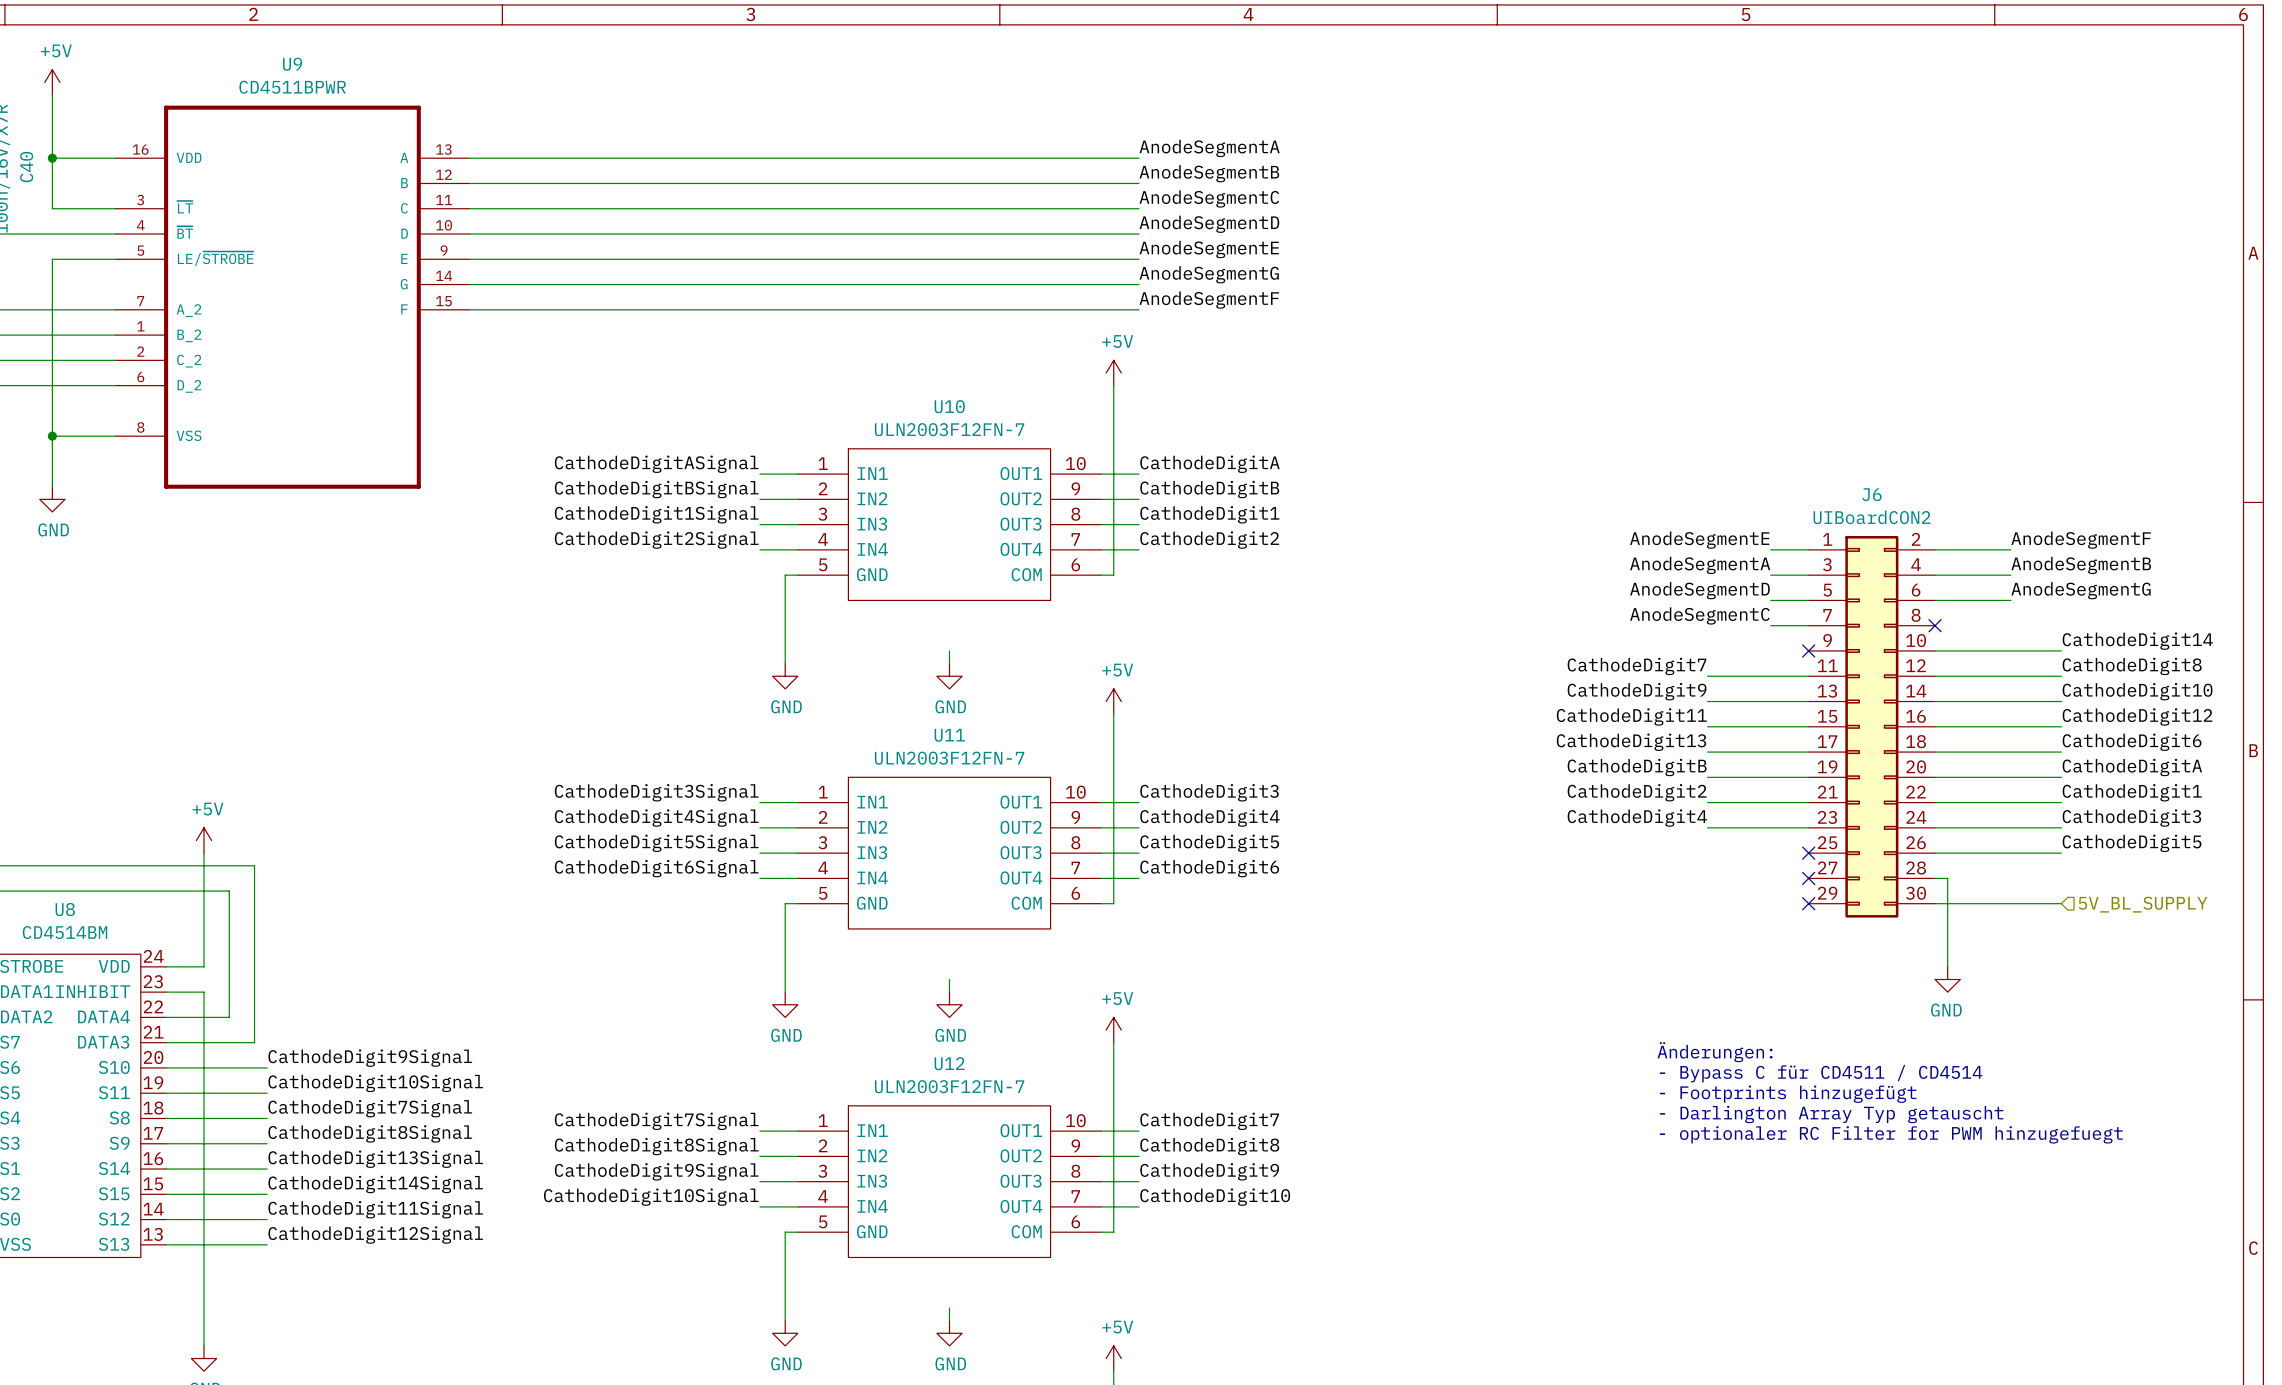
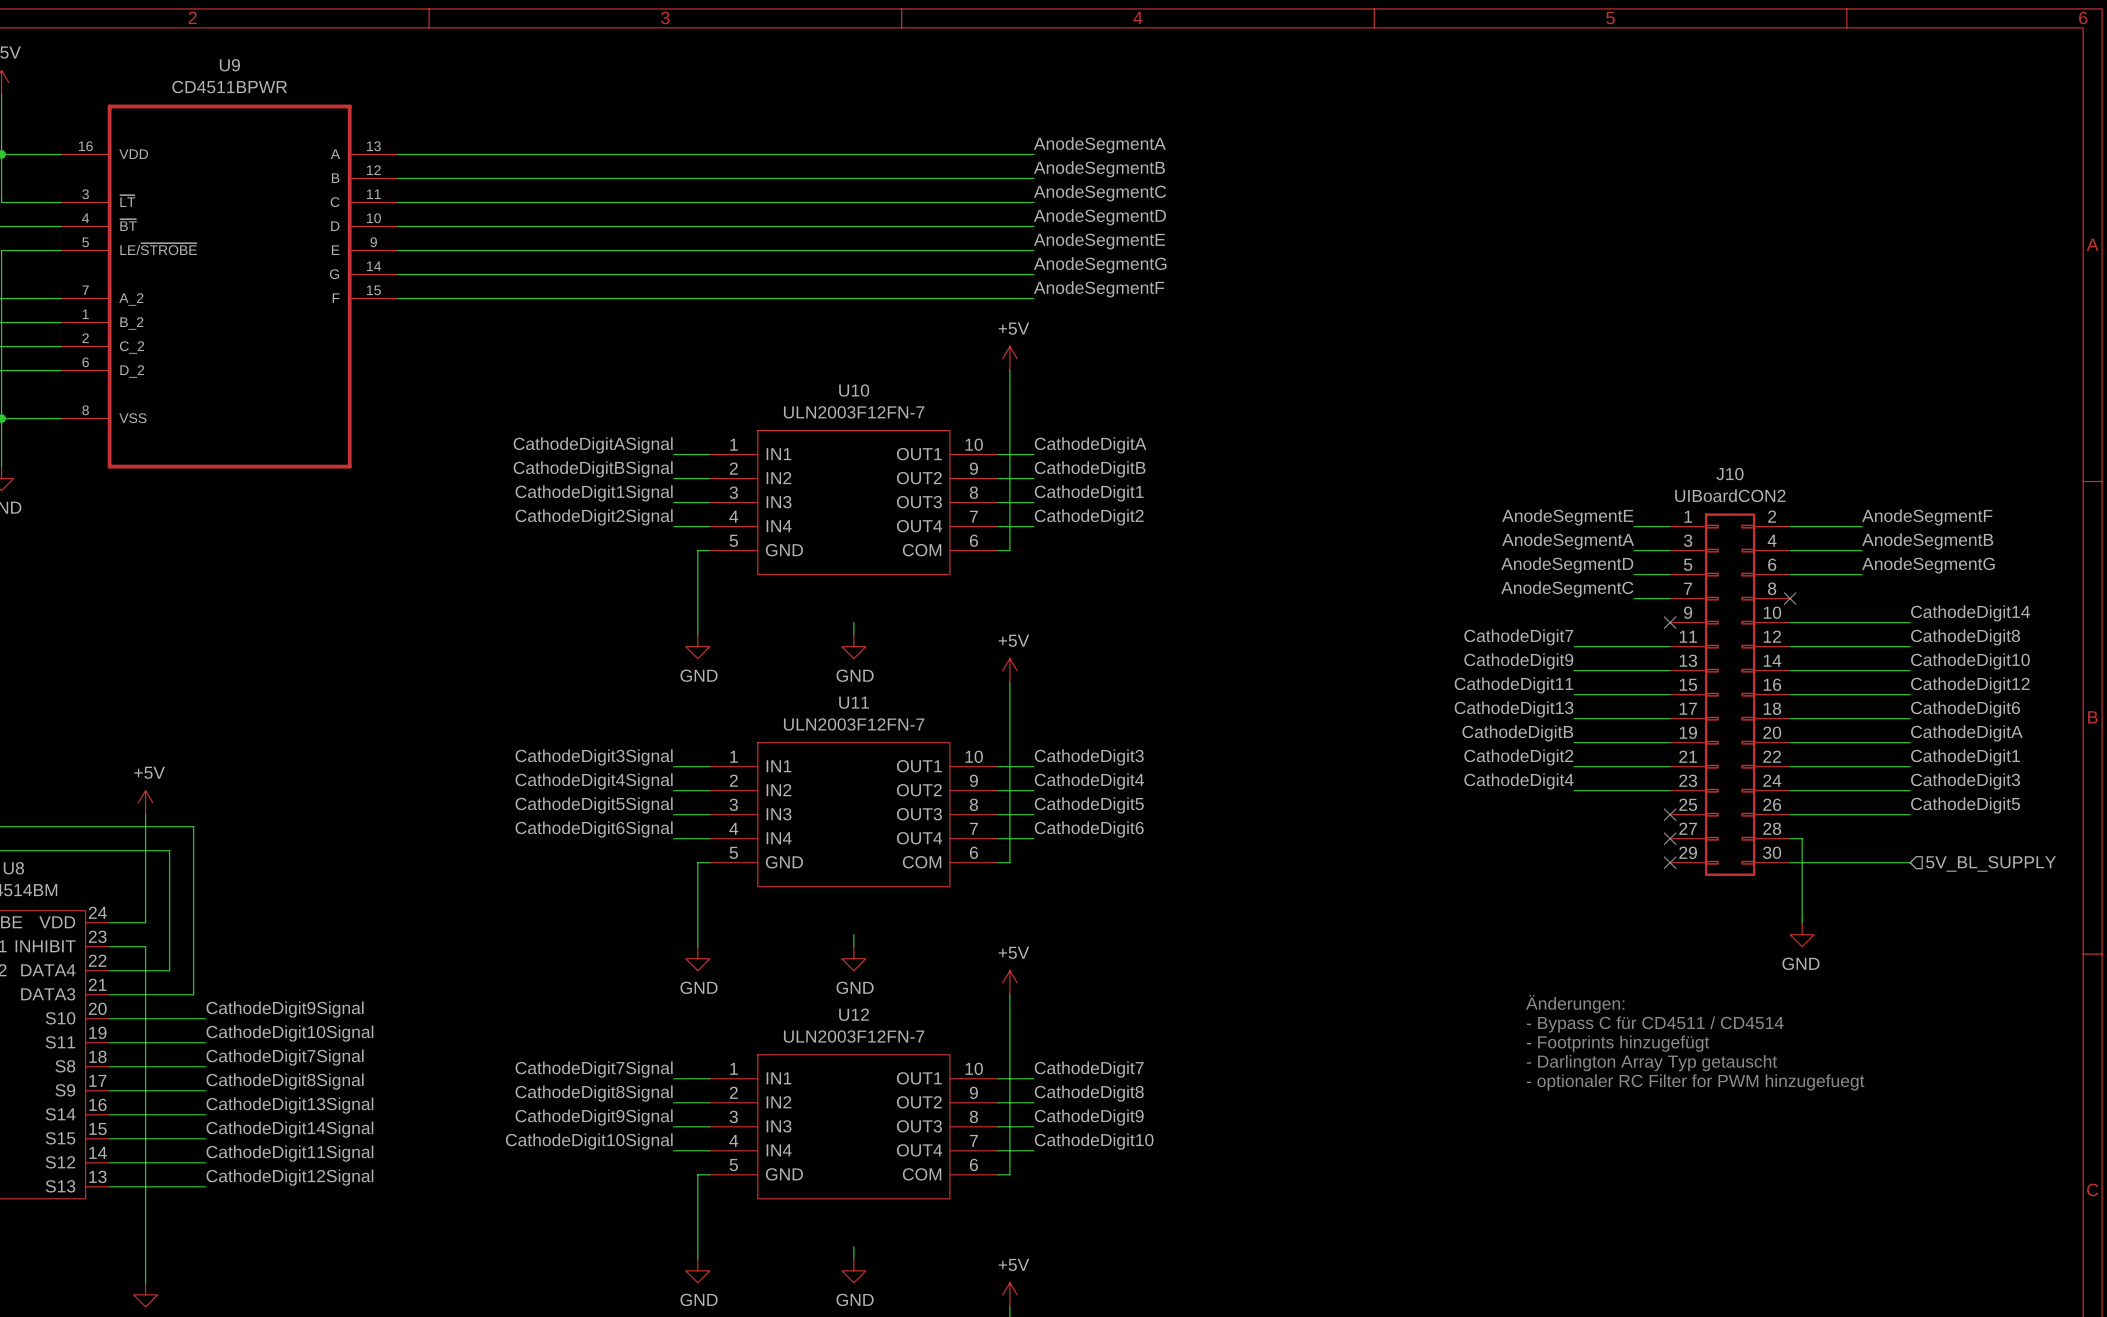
J6 name: J6 (1871, 494) -> J10 (1729, 474)

